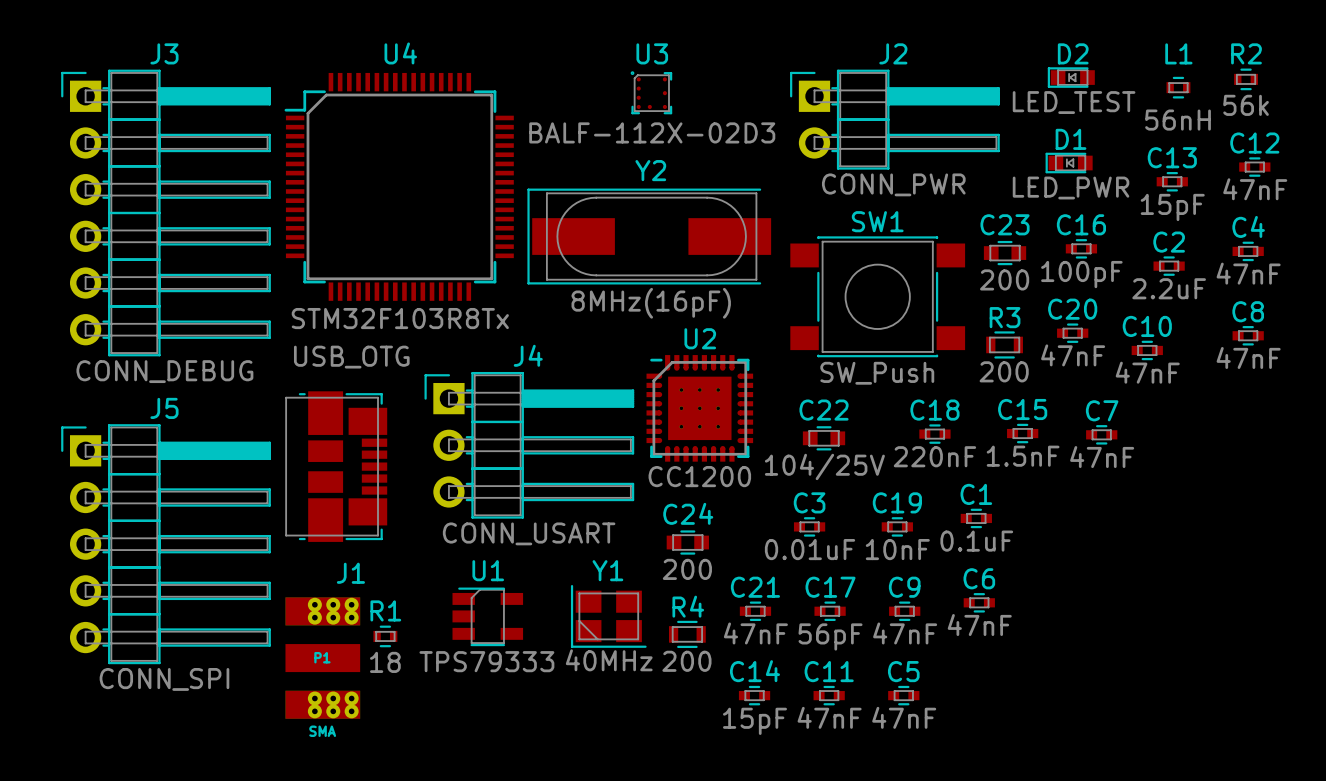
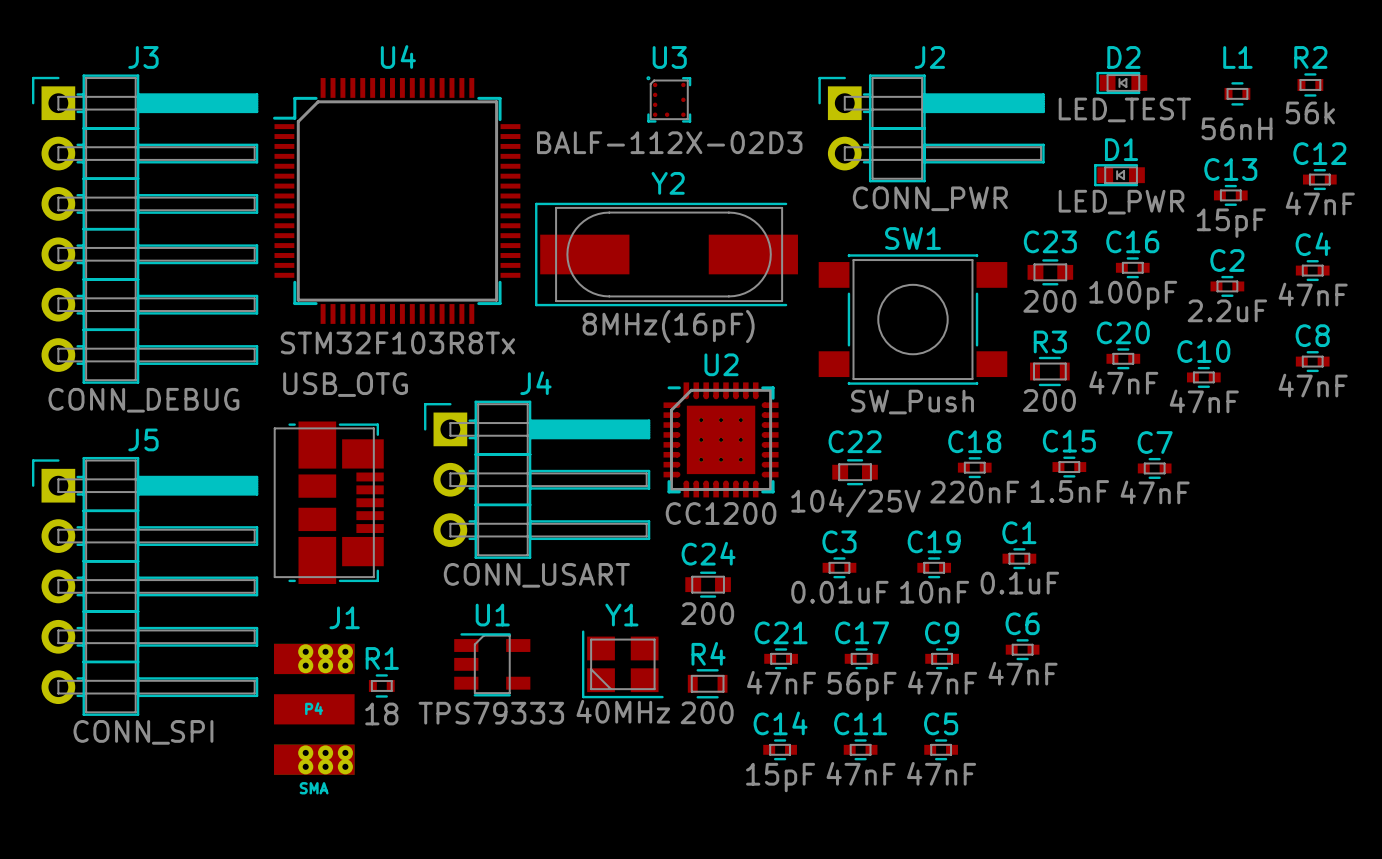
P1 name: P1 (322, 657) -> P4 (314, 708)

